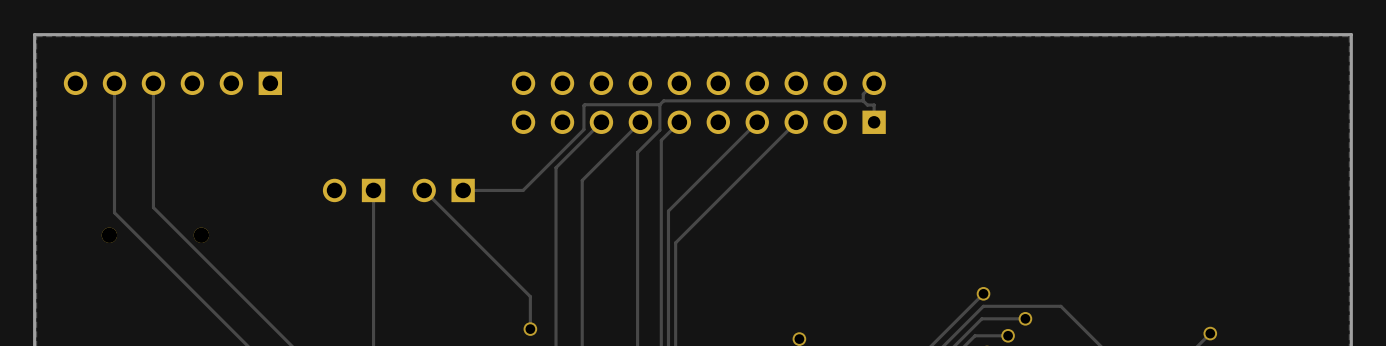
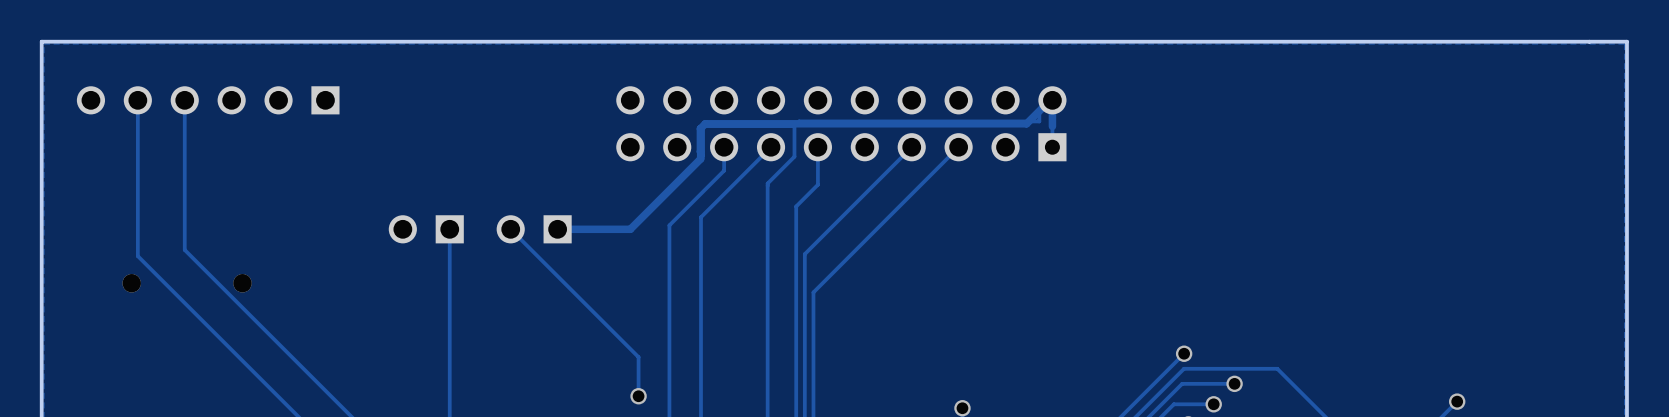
track: (863, 100) (867, 105) (874, 105) -> (557, 229) (630, 229) (700, 158) (700, 128) (705, 123) (1026, 123) (1050, 100) (1052, 100) (1052, 126)
track: (601, 122) (556, 167) (556, 187) -> (724, 147) (724, 170) (669, 225)
track: (679, 122) (661, 140) (661, 171) -> (817, 147) (817, 184) (796, 206)

